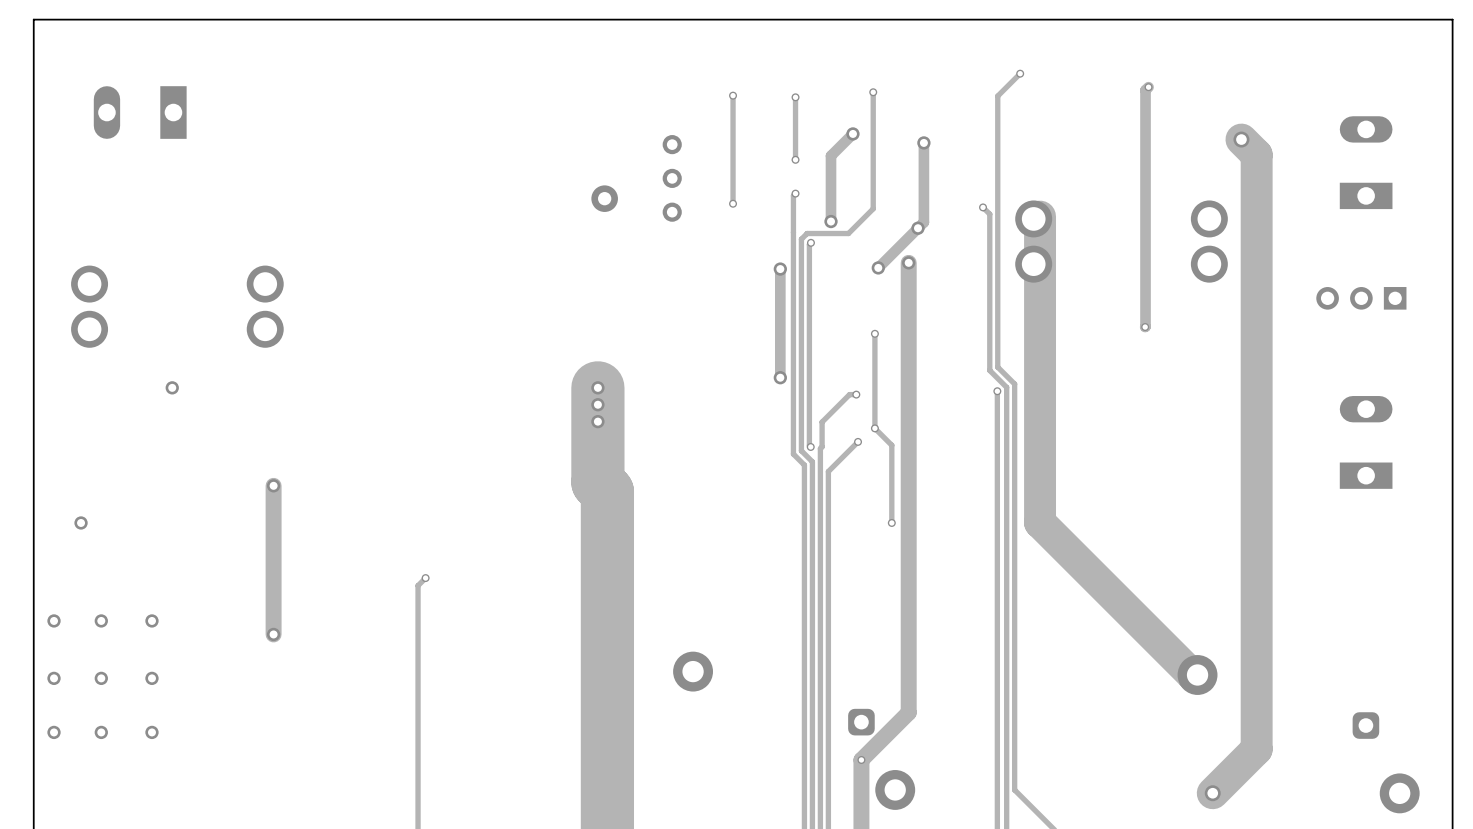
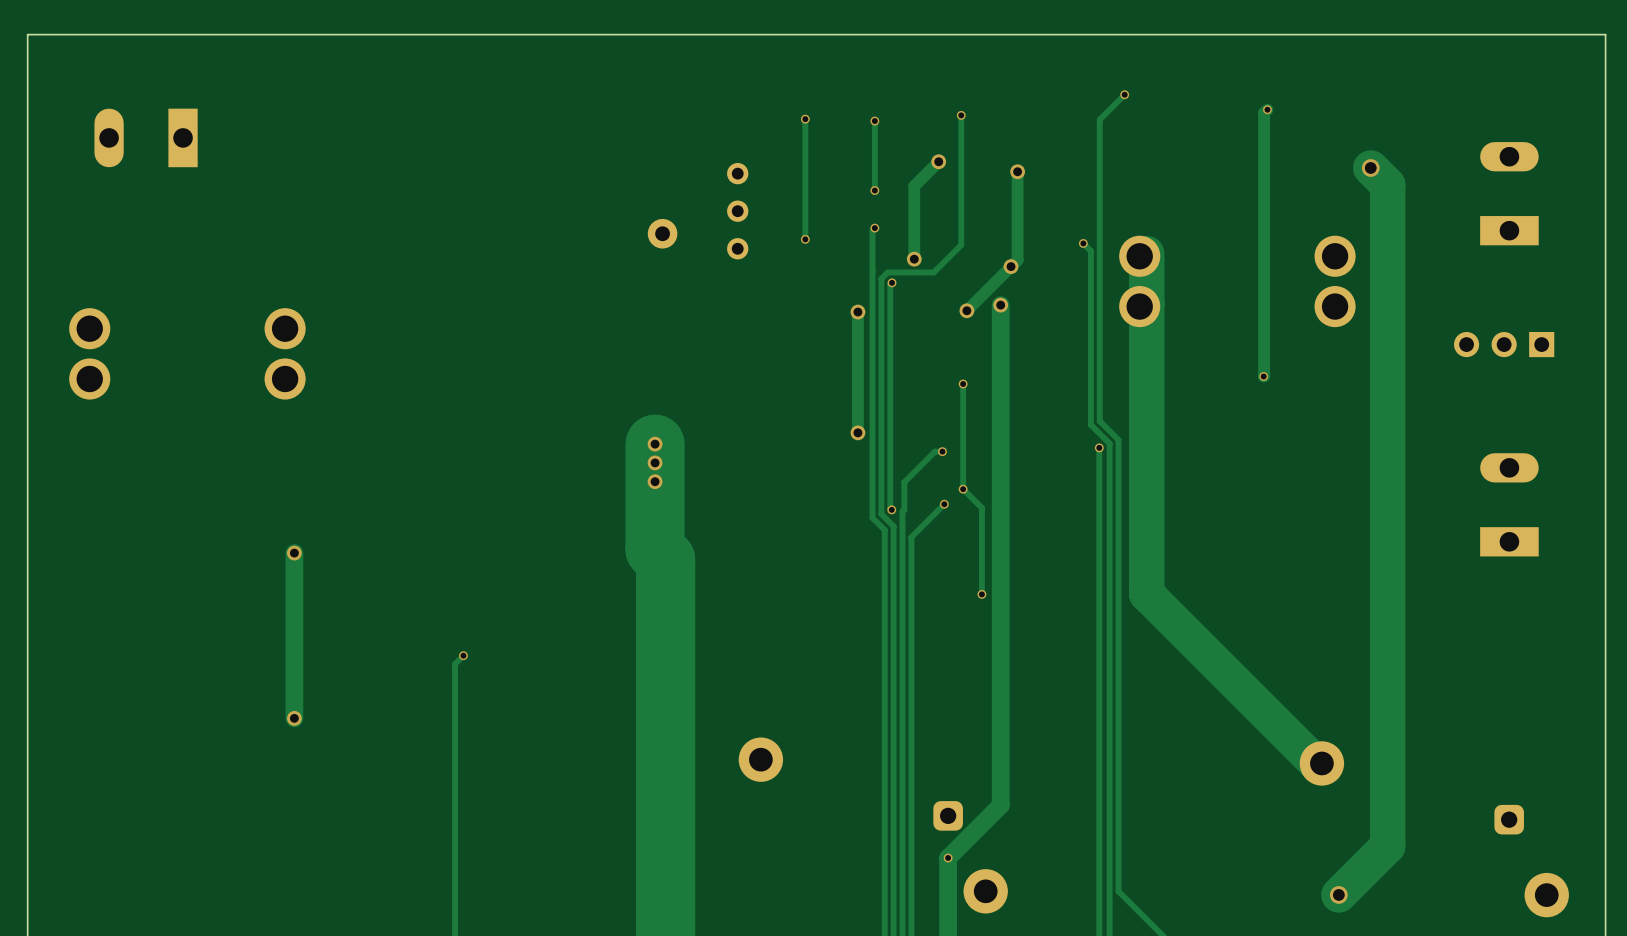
via: (172, 387) -> none
via: (81, 522) -> none
via: (54, 620) -> none
via: (101, 620) -> none
via: (151, 620) -> none
via: (54, 678) -> none
via: (101, 678) -> none
via: (151, 678) -> none
via: (54, 732) -> none
via: (101, 732) -> none
via: (151, 732) -> none

